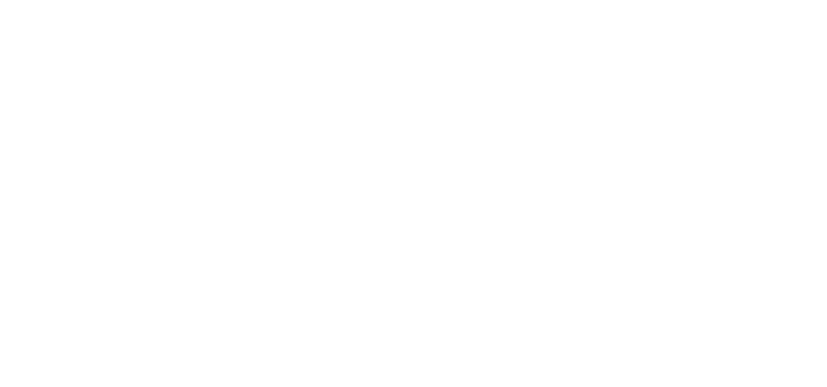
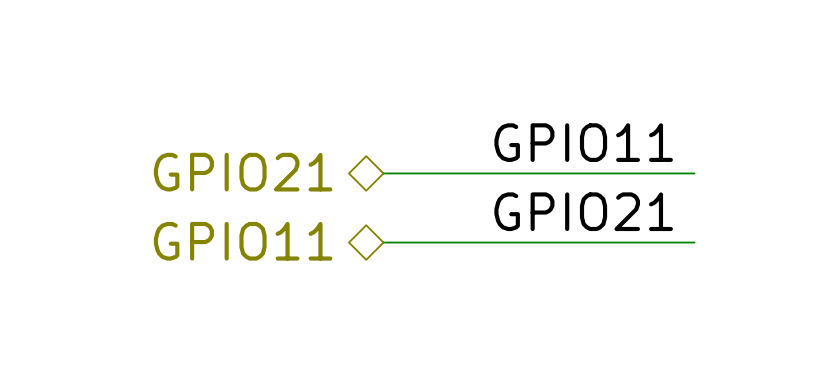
label: none -> GPIO11 (583, 142)
hierarchical label: none -> GPIO21 (243, 172)
wire: none -> (383, 173) (694, 173)
label: none -> GPIO21 (583, 211)
hierarchical label: none -> GPIO11 (243, 241)
wire: none -> (383, 242) (694, 242)

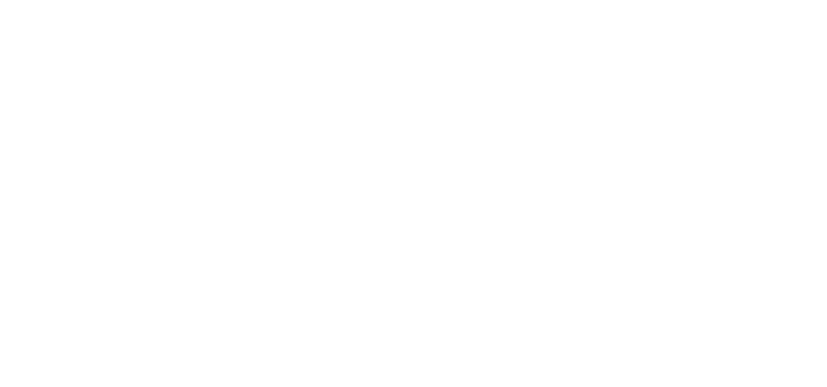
label: GPIO11 (583, 142) -> none
hierarchical label: GPIO21 (243, 172) -> none
wire: (383, 173) (694, 173) -> none
label: GPIO21 (583, 211) -> none
hierarchical label: GPIO11 (243, 241) -> none
wire: (383, 242) (694, 242) -> none

